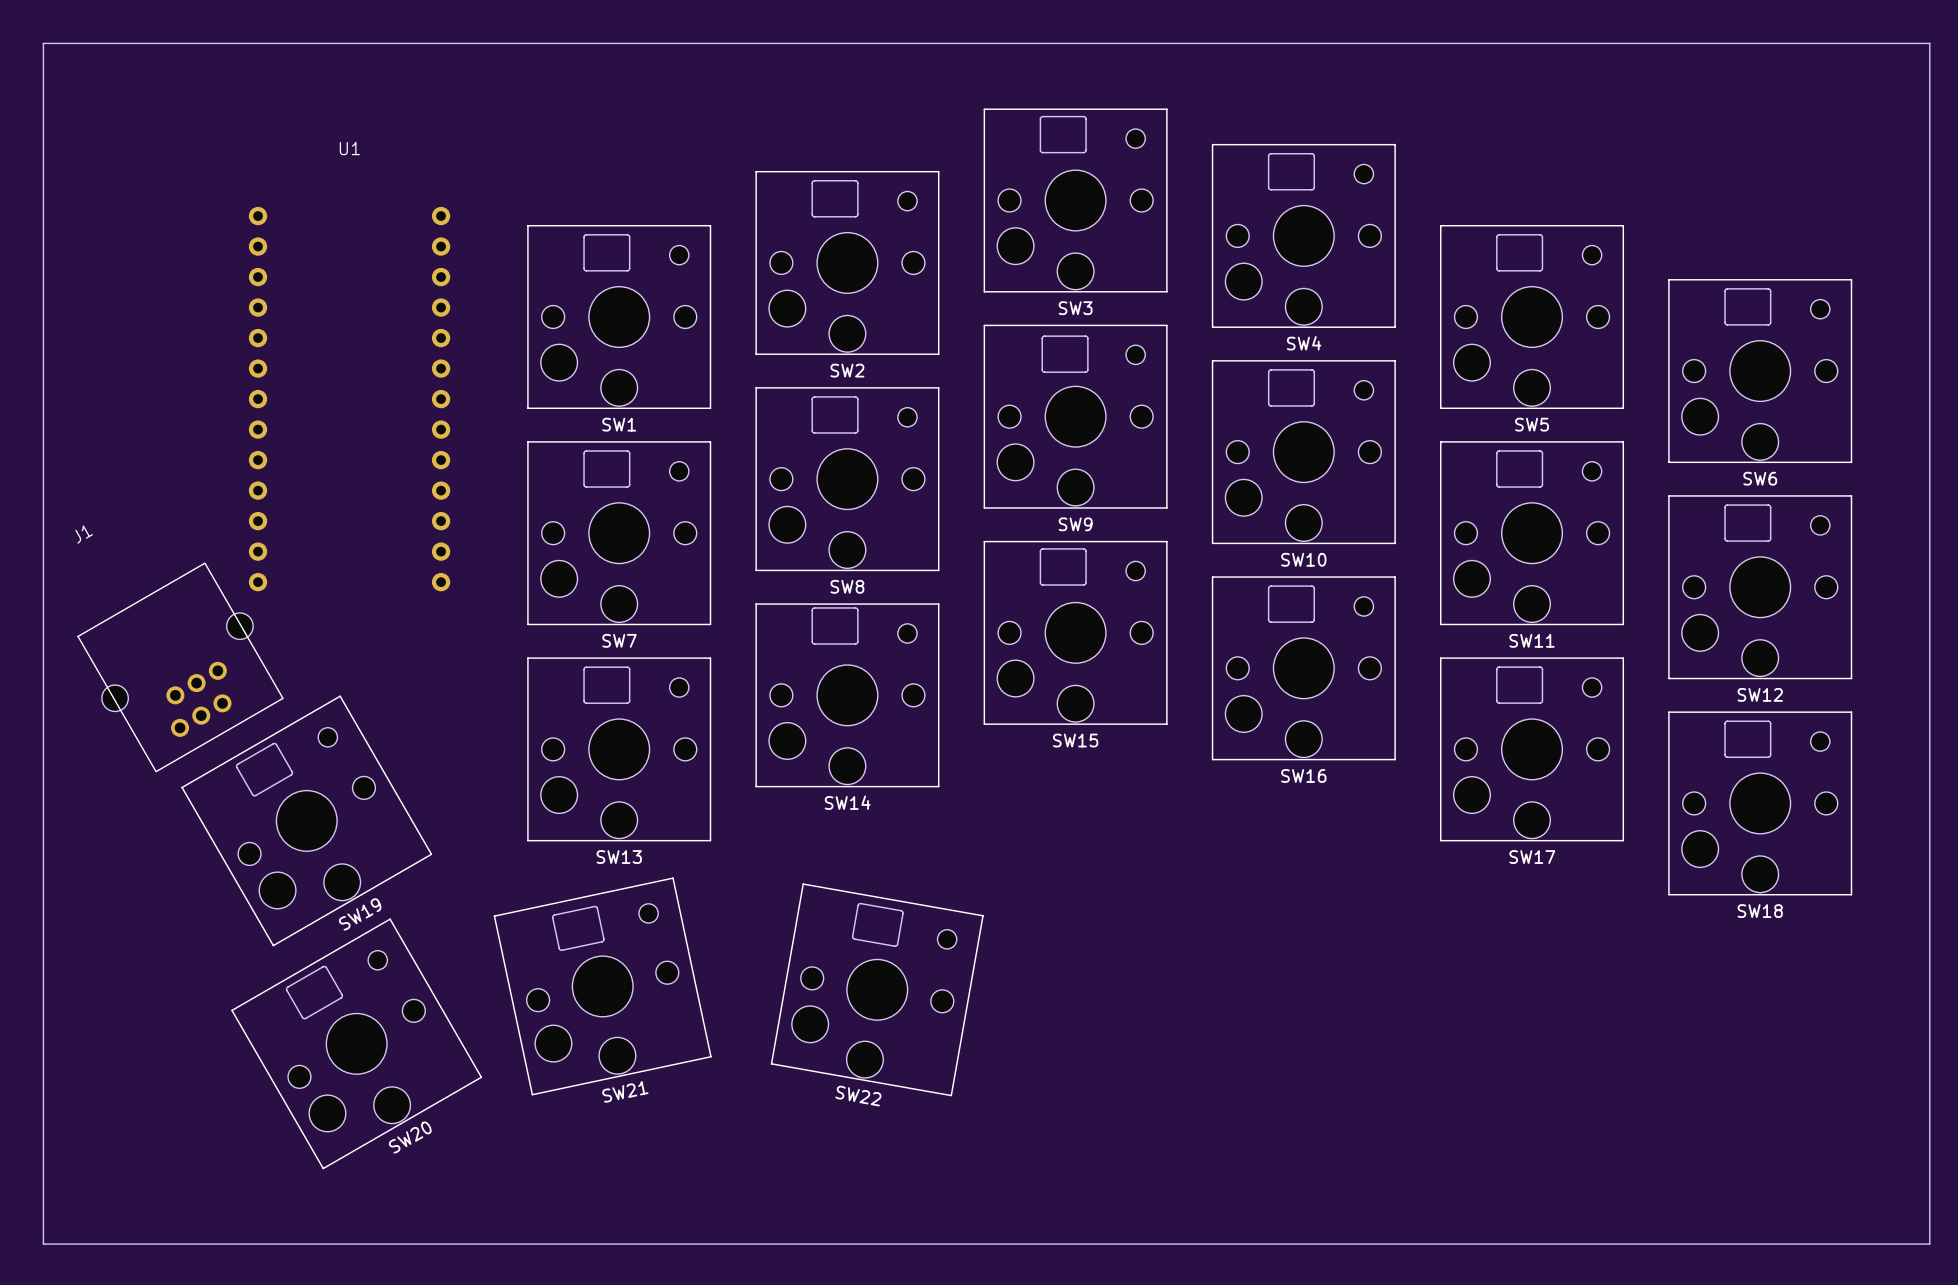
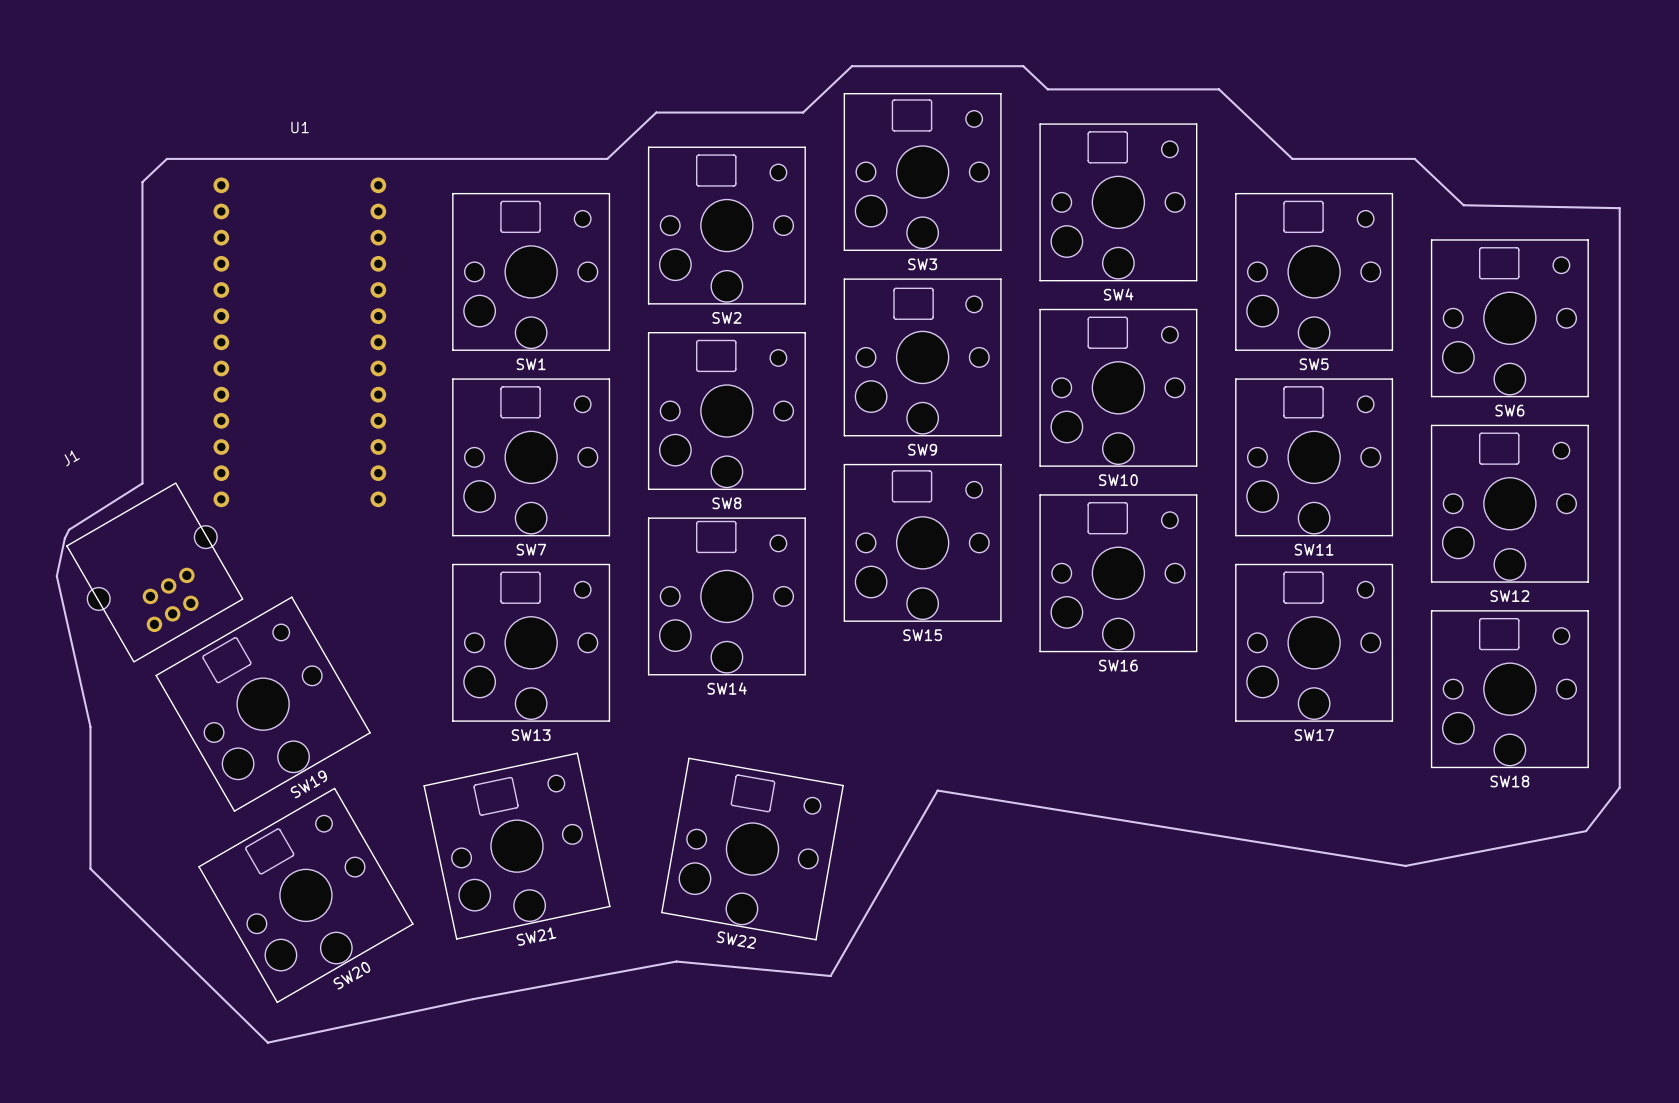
board edge: (43, 43) (1929, 43) (1929, 1244) (43, 1244) (43, 43) -> (852, 66) (803, 112) (656, 112) (607, 158) (166, 158) (142, 182) (142, 483) (69, 529) (64, 538) (56, 576) (90, 726) (90, 868) (267, 1042) (472, 999) (676, 961) (830, 976) (937, 790) (1405, 865) (1586, 831) (1619, 787) (1619, 208) (1463, 205) (1414, 158) (1292, 158) (1219, 89) (1047, 89) (1023, 66) (852, 66)

